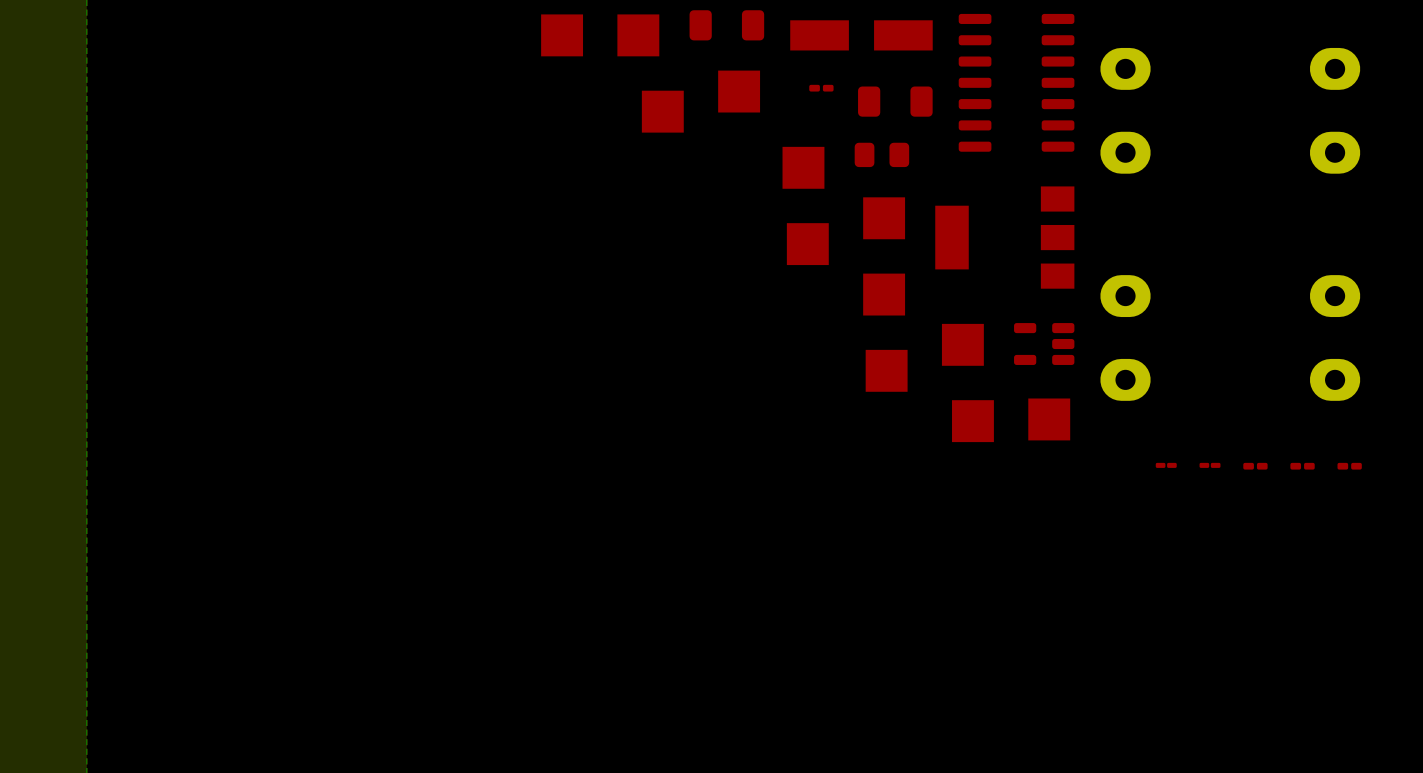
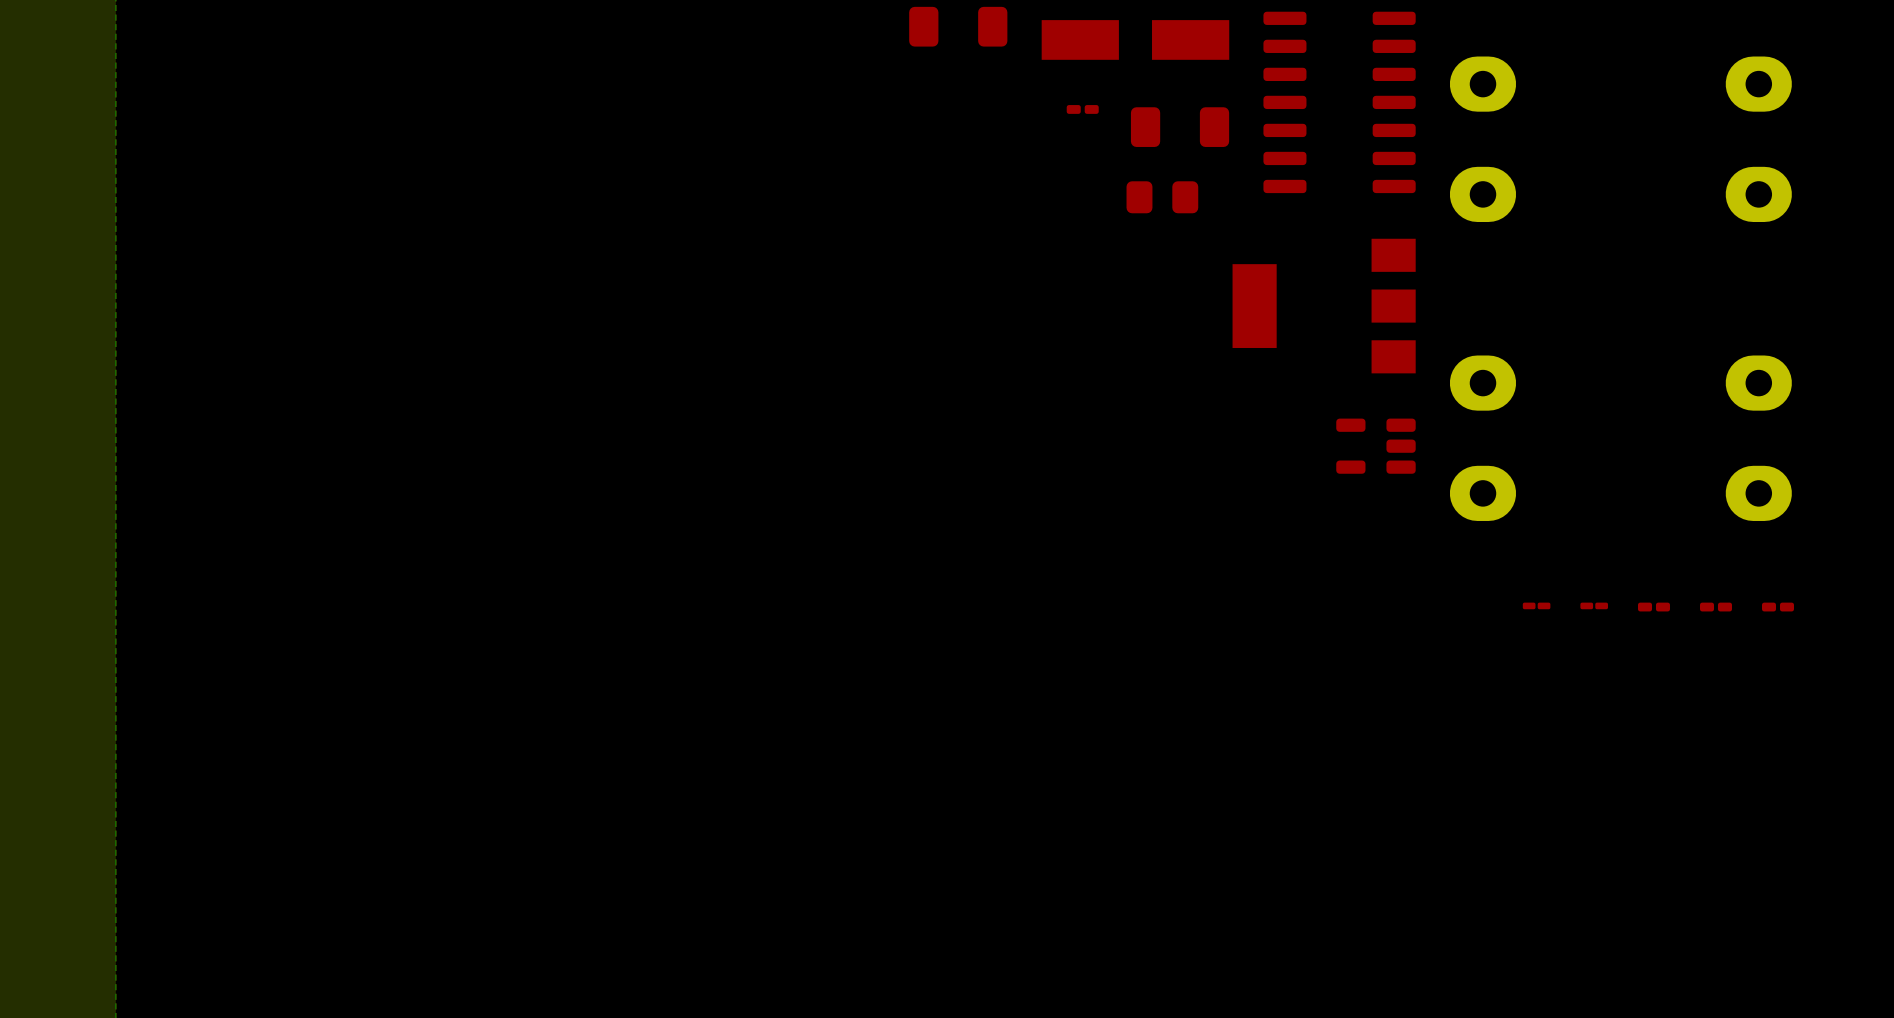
part: (562, 35) -> none
part: (638, 35) -> none
part: (739, 91) -> none
part: (662, 111) -> none
part: (803, 167) -> none
part: (884, 218) -> none
part: (807, 244) -> none
part: (884, 294) -> none
part: (962, 344) -> none
part: (886, 370) -> none
part: (1049, 419) -> none
part: (972, 421) -> none

